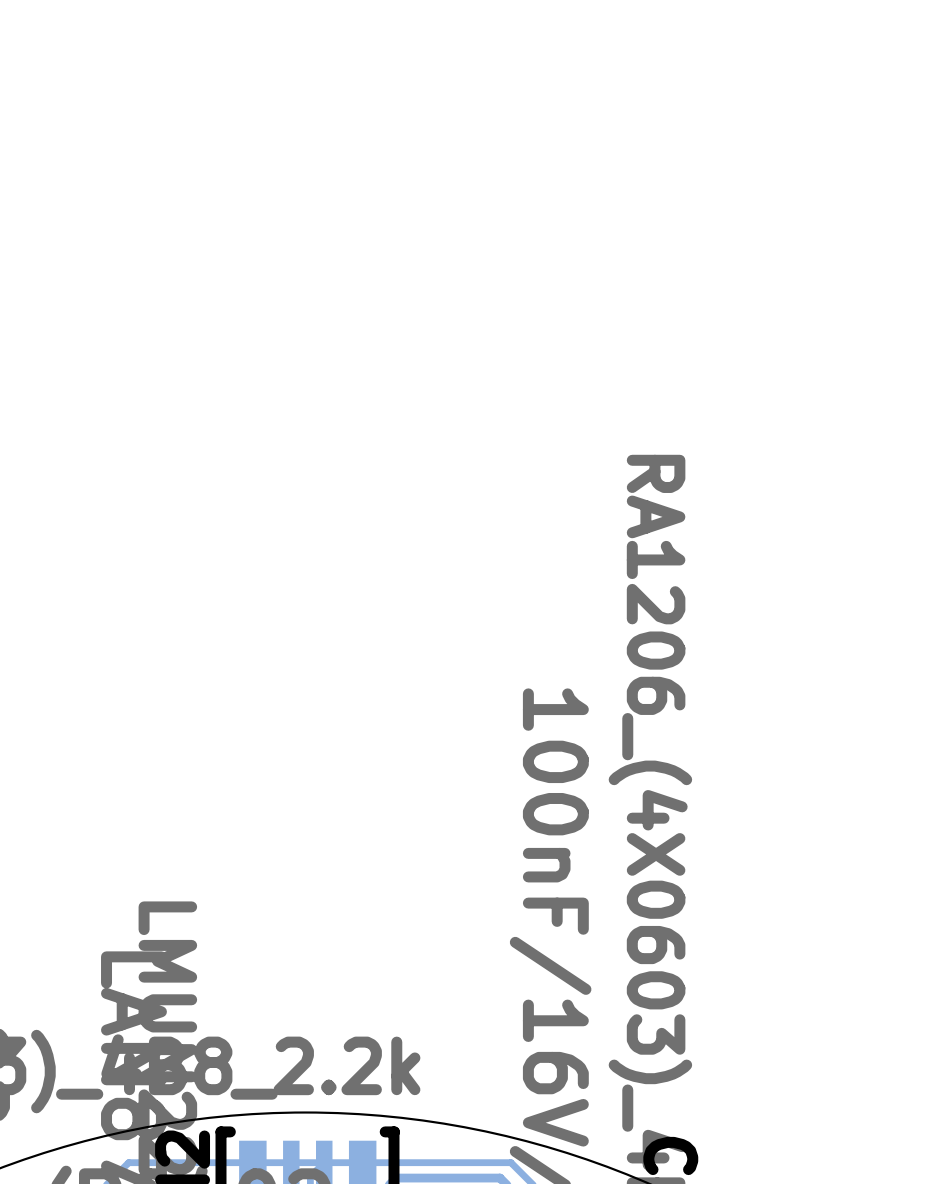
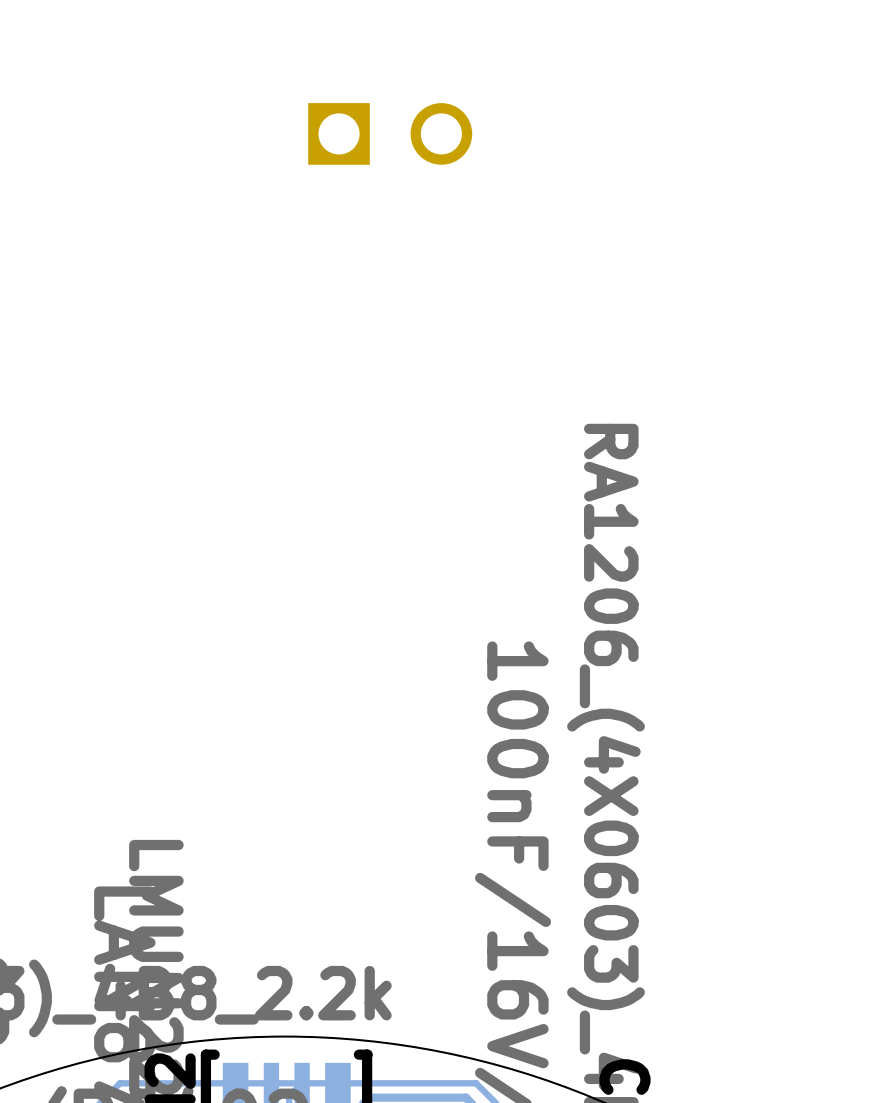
part: none -> (390, 133)

